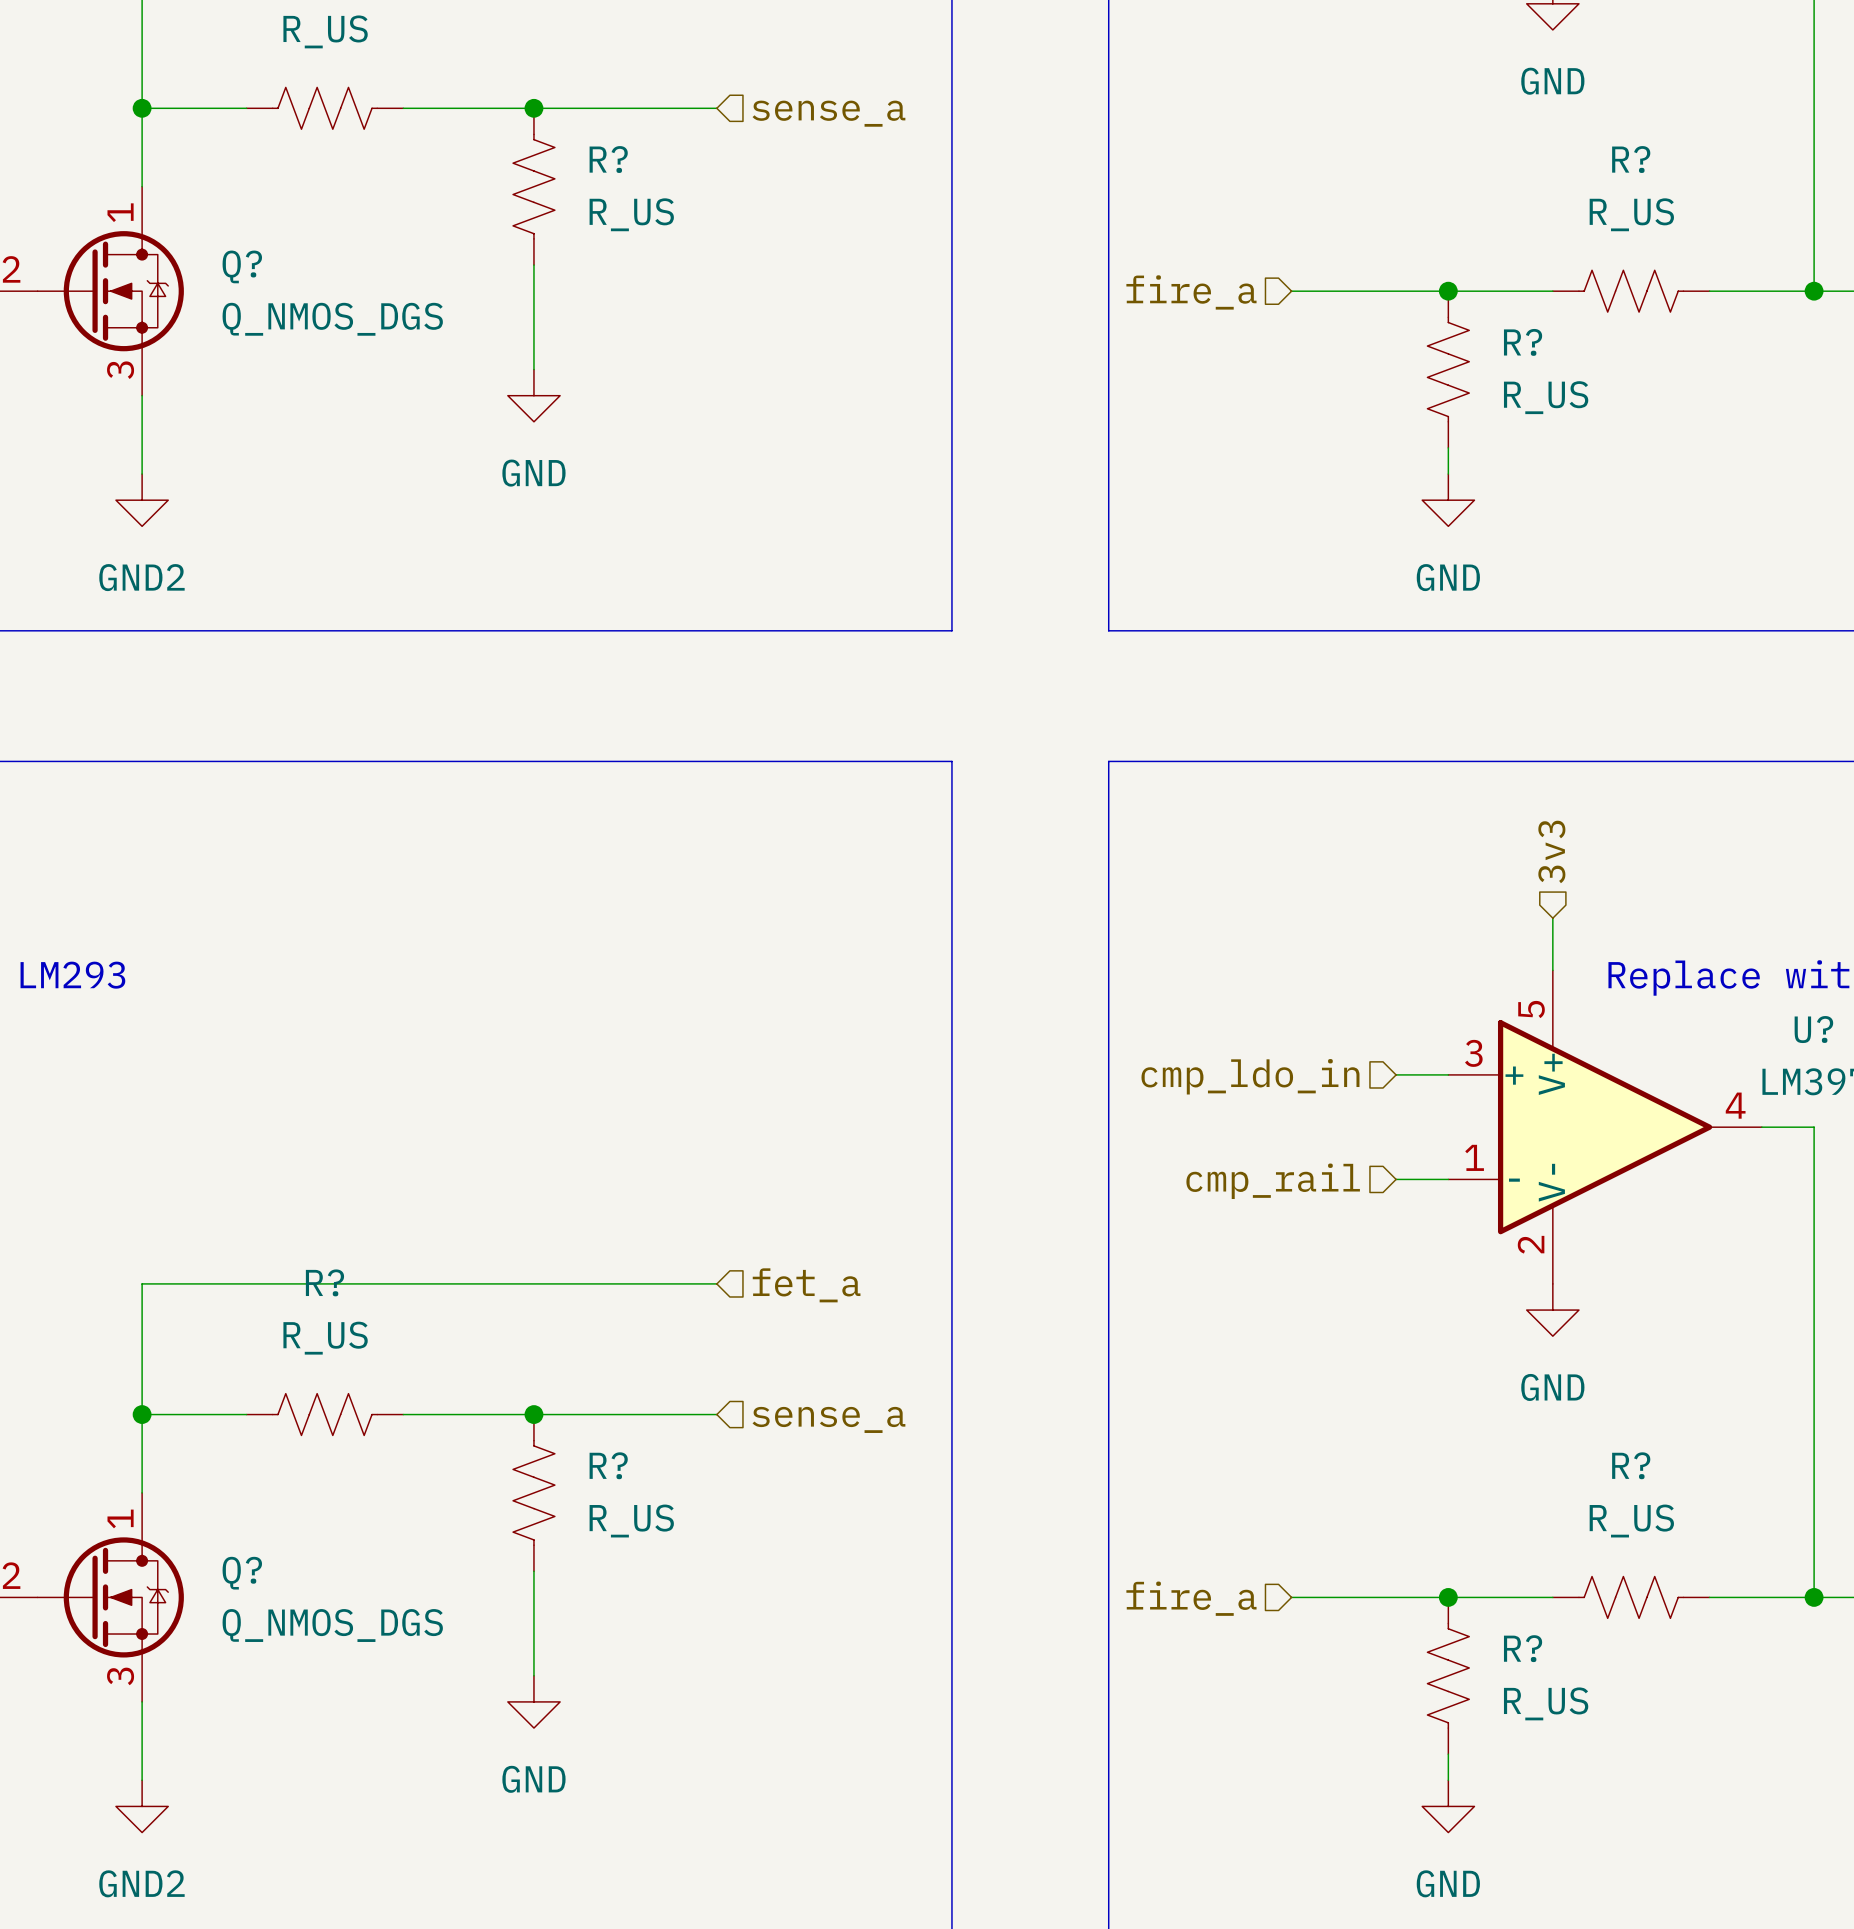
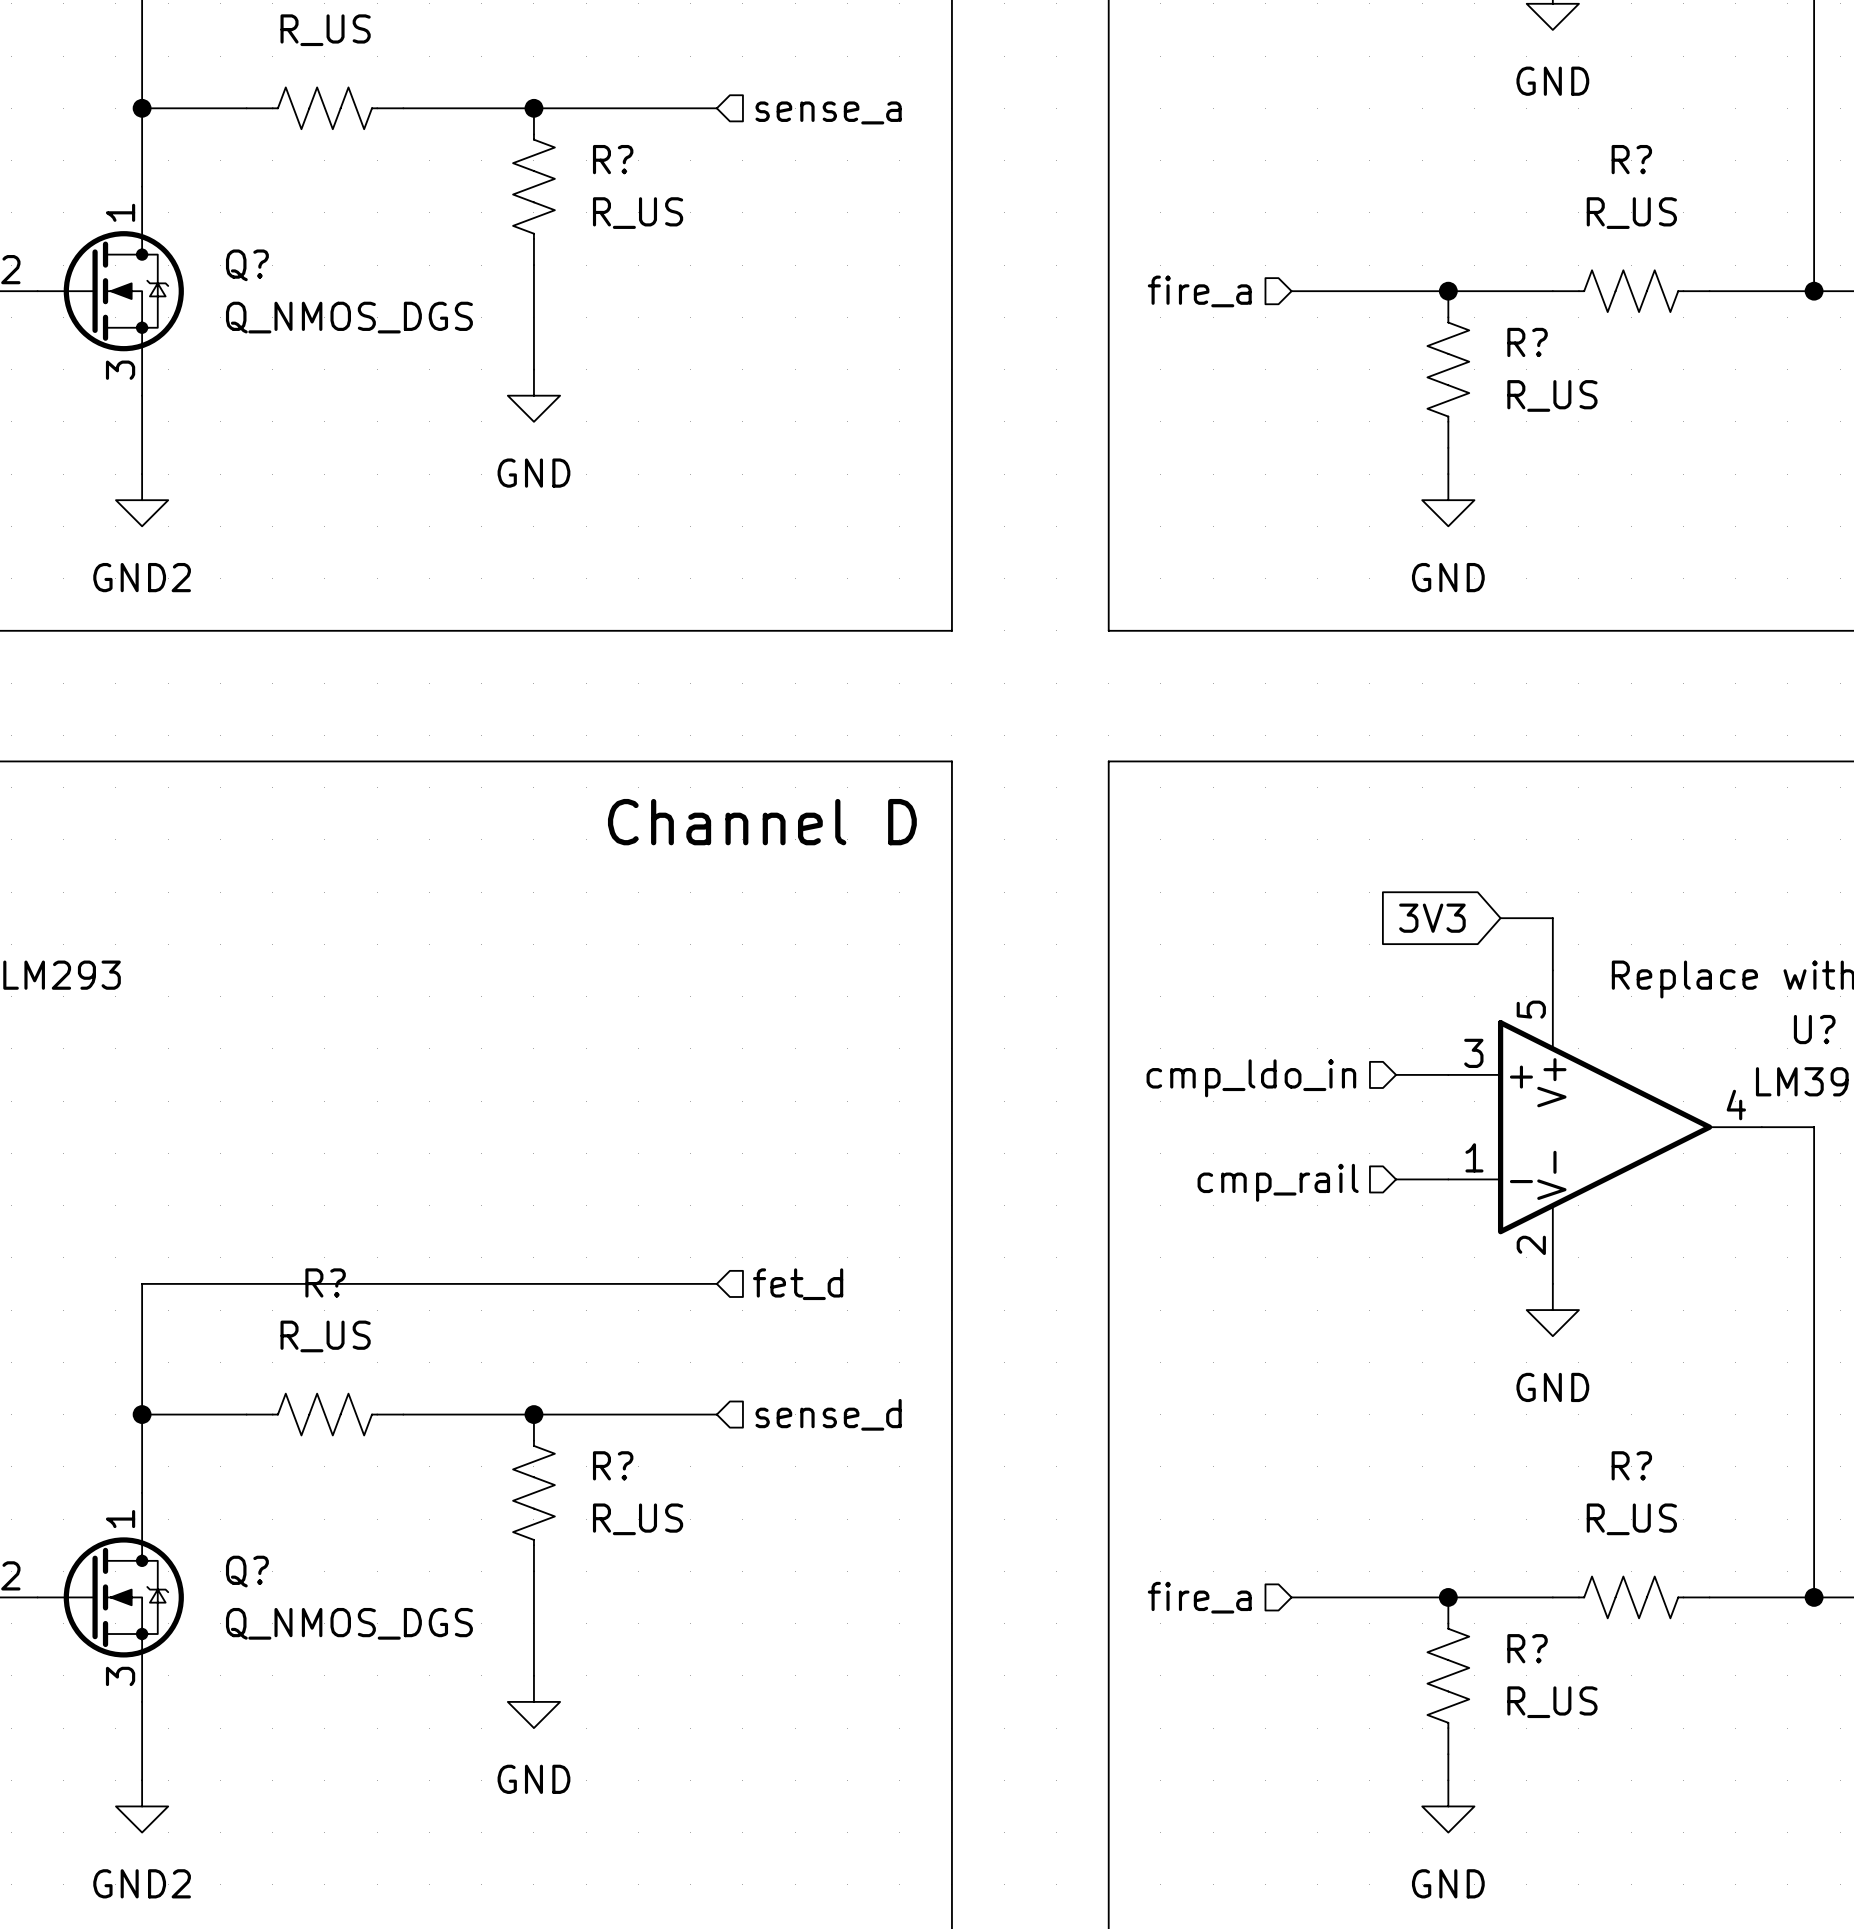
text: none -> Channel D (762, 822)
hierarchical label: 3v3 (1551, 851) -> none
global label: none -> 3V3 (1432, 918)
wire: none -> (1500, 918) (1552, 918)
hierarchical label: fet_a (806, 1285) -> fet_d (798, 1284)
hierarchical label: sense_a (828, 1419) -> sense_d (828, 1414)

